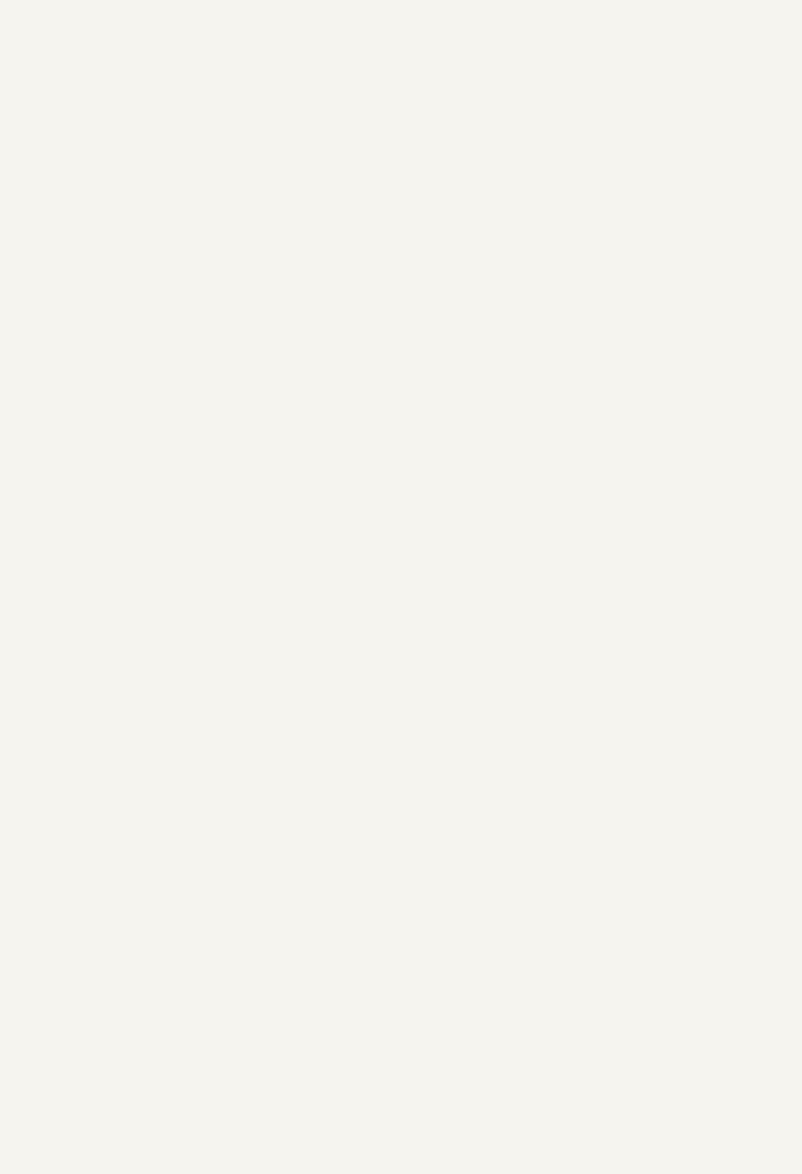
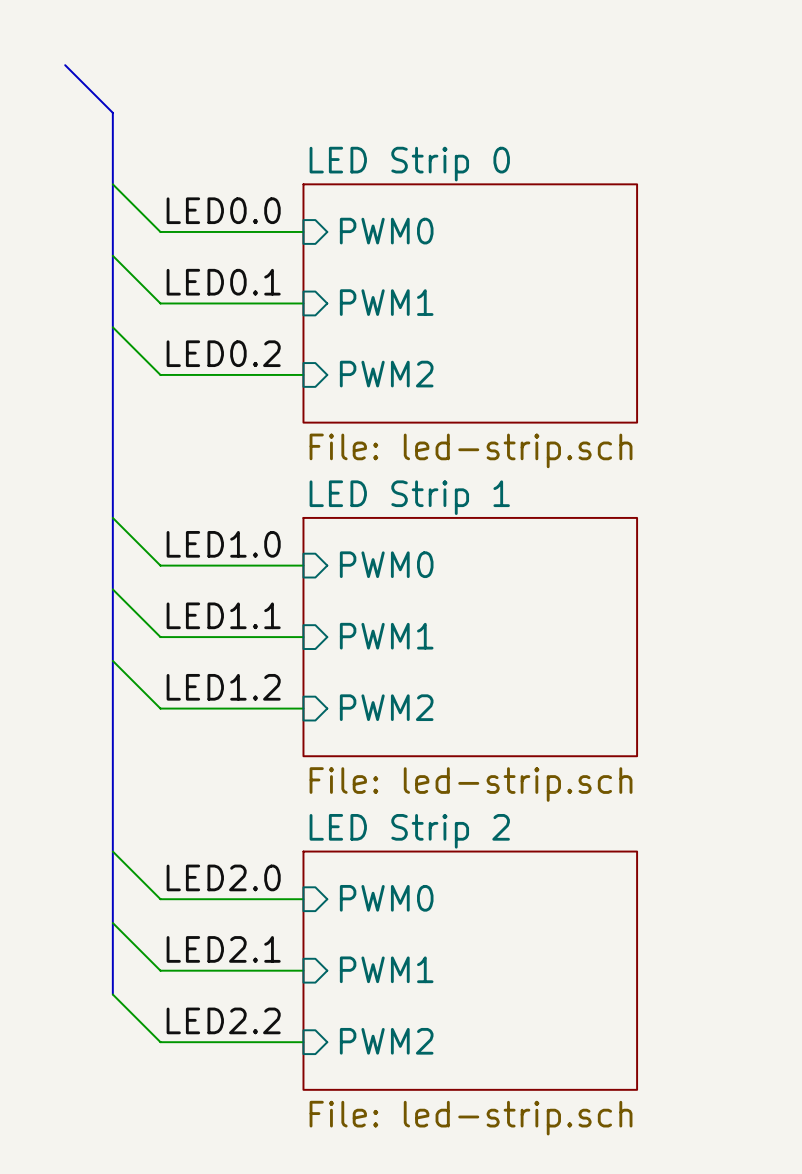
bus: none -> (65, 65) (112, 112) (112, 994)
wire: none -> (112, 184) (160, 231) (303, 231)
label: none -> LED0.0 (223, 210)
sheet pin: none -> PWM0 (386, 231)
wire: none -> (112, 255) (160, 303) (303, 303)
label: none -> LED0.1 (223, 282)
sheet pin: none -> PWM1 (386, 302)
sheet LED Strip 0: none -> File: led-strip.sch (470, 303)
wire: none -> (112, 327) (160, 374) (303, 374)
label: none -> LED0.2 (223, 353)
sheet pin: none -> PWM2 (386, 374)
wire: none -> (112, 517) (160, 565) (303, 565)
label: none -> LED1.0 (223, 544)
sheet pin: none -> PWM0 (386, 564)
wire: none -> (112, 589) (160, 637) (303, 637)
label: none -> LED1.1 (223, 615)
sheet pin: none -> PWM1 (386, 636)
sheet LED Strip 1: none -> File: led-strip.sch (470, 637)
wire: none -> (112, 660) (160, 708) (303, 708)
label: none -> LED1.2 (223, 687)
sheet pin: none -> PWM2 (386, 707)
wire: none -> (112, 851) (160, 899) (303, 899)
label: none -> LED2.0 (223, 877)
sheet pin: none -> PWM0 (386, 898)
wire: none -> (112, 923) (160, 970) (303, 970)
label: none -> LED2.1 (223, 949)
sheet pin: none -> PWM1 (386, 969)
sheet LED Strip 2: none -> File: led-strip.sch (470, 970)
wire: none -> (112, 994) (160, 1042) (303, 1042)
label: none -> LED2.2 (223, 1020)
sheet pin: none -> PWM2 (386, 1041)

